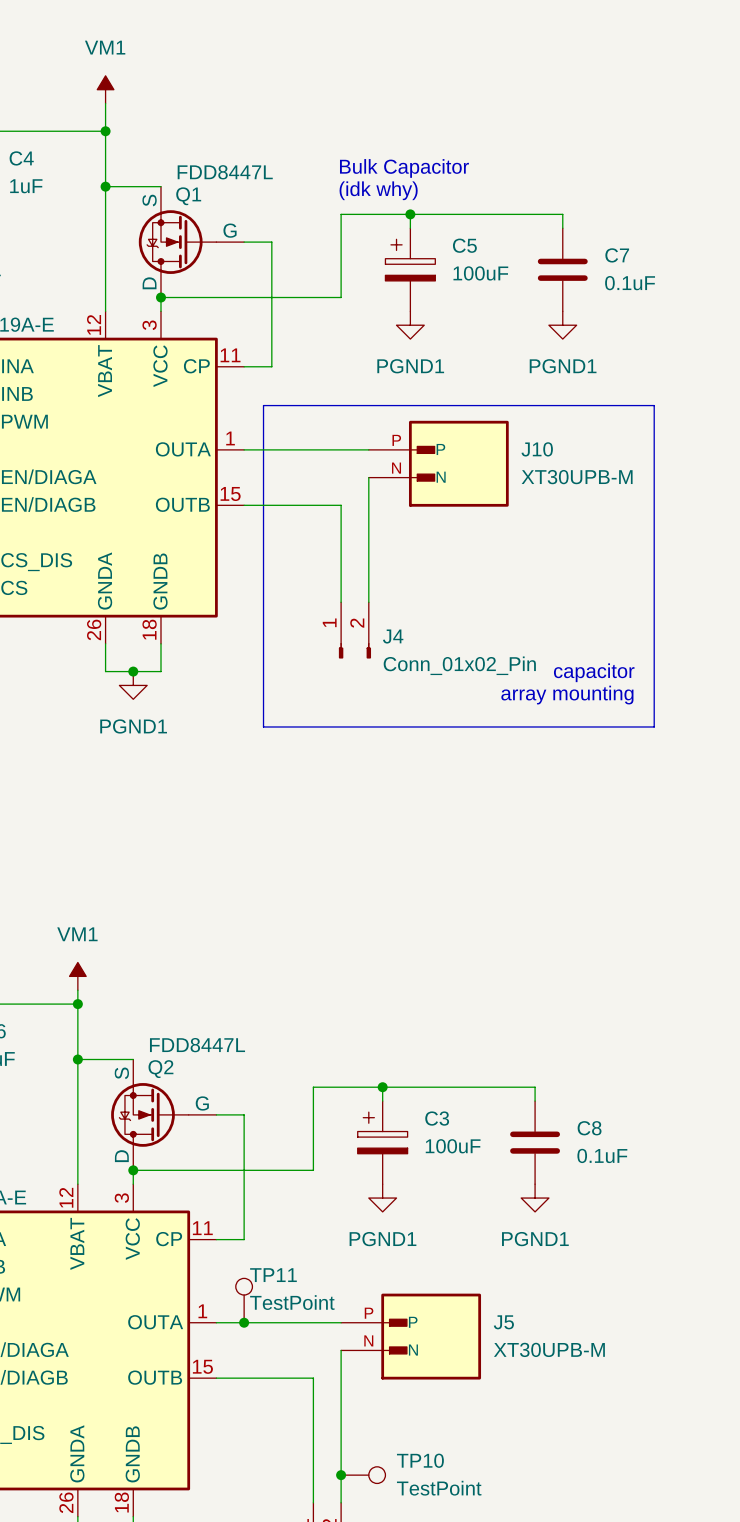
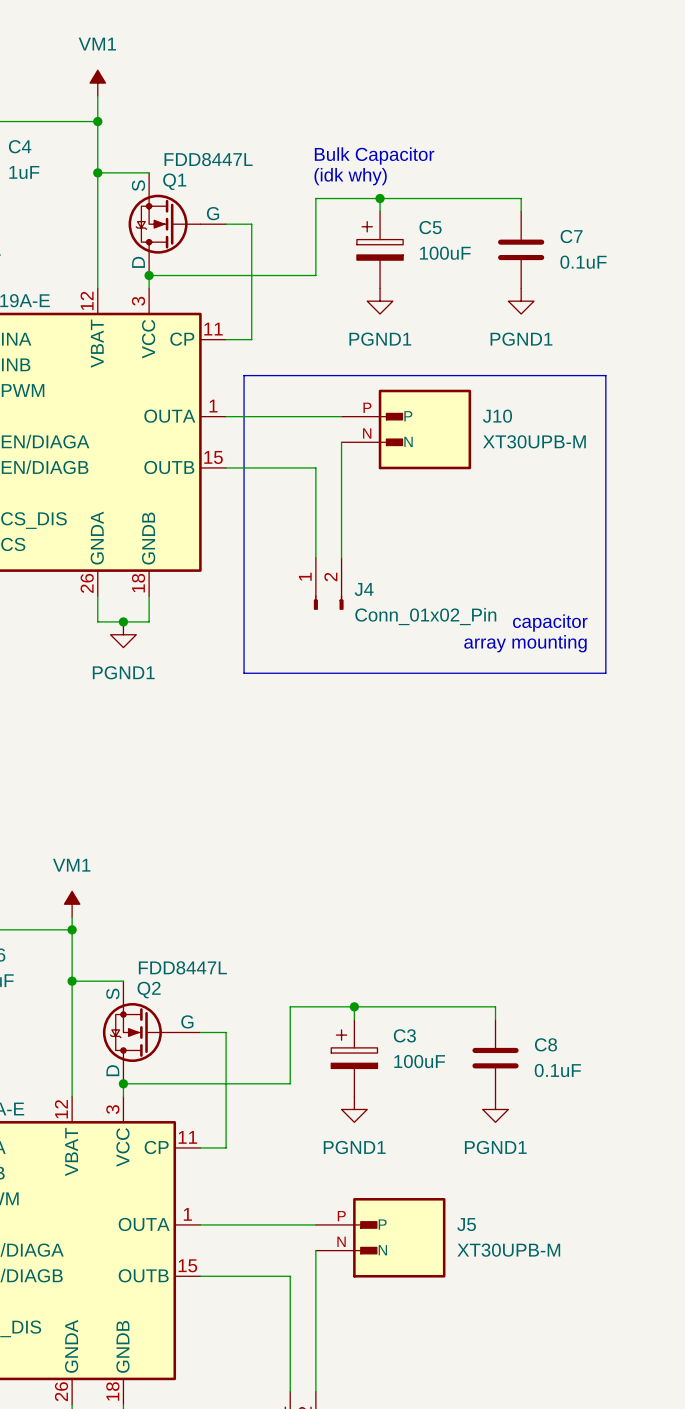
TP11: TestPoint (244, 1300) -> none
junction: (244, 1322) -> none
junction: (341, 1475) -> none
TP10: TestPoint (363, 1475) -> none

